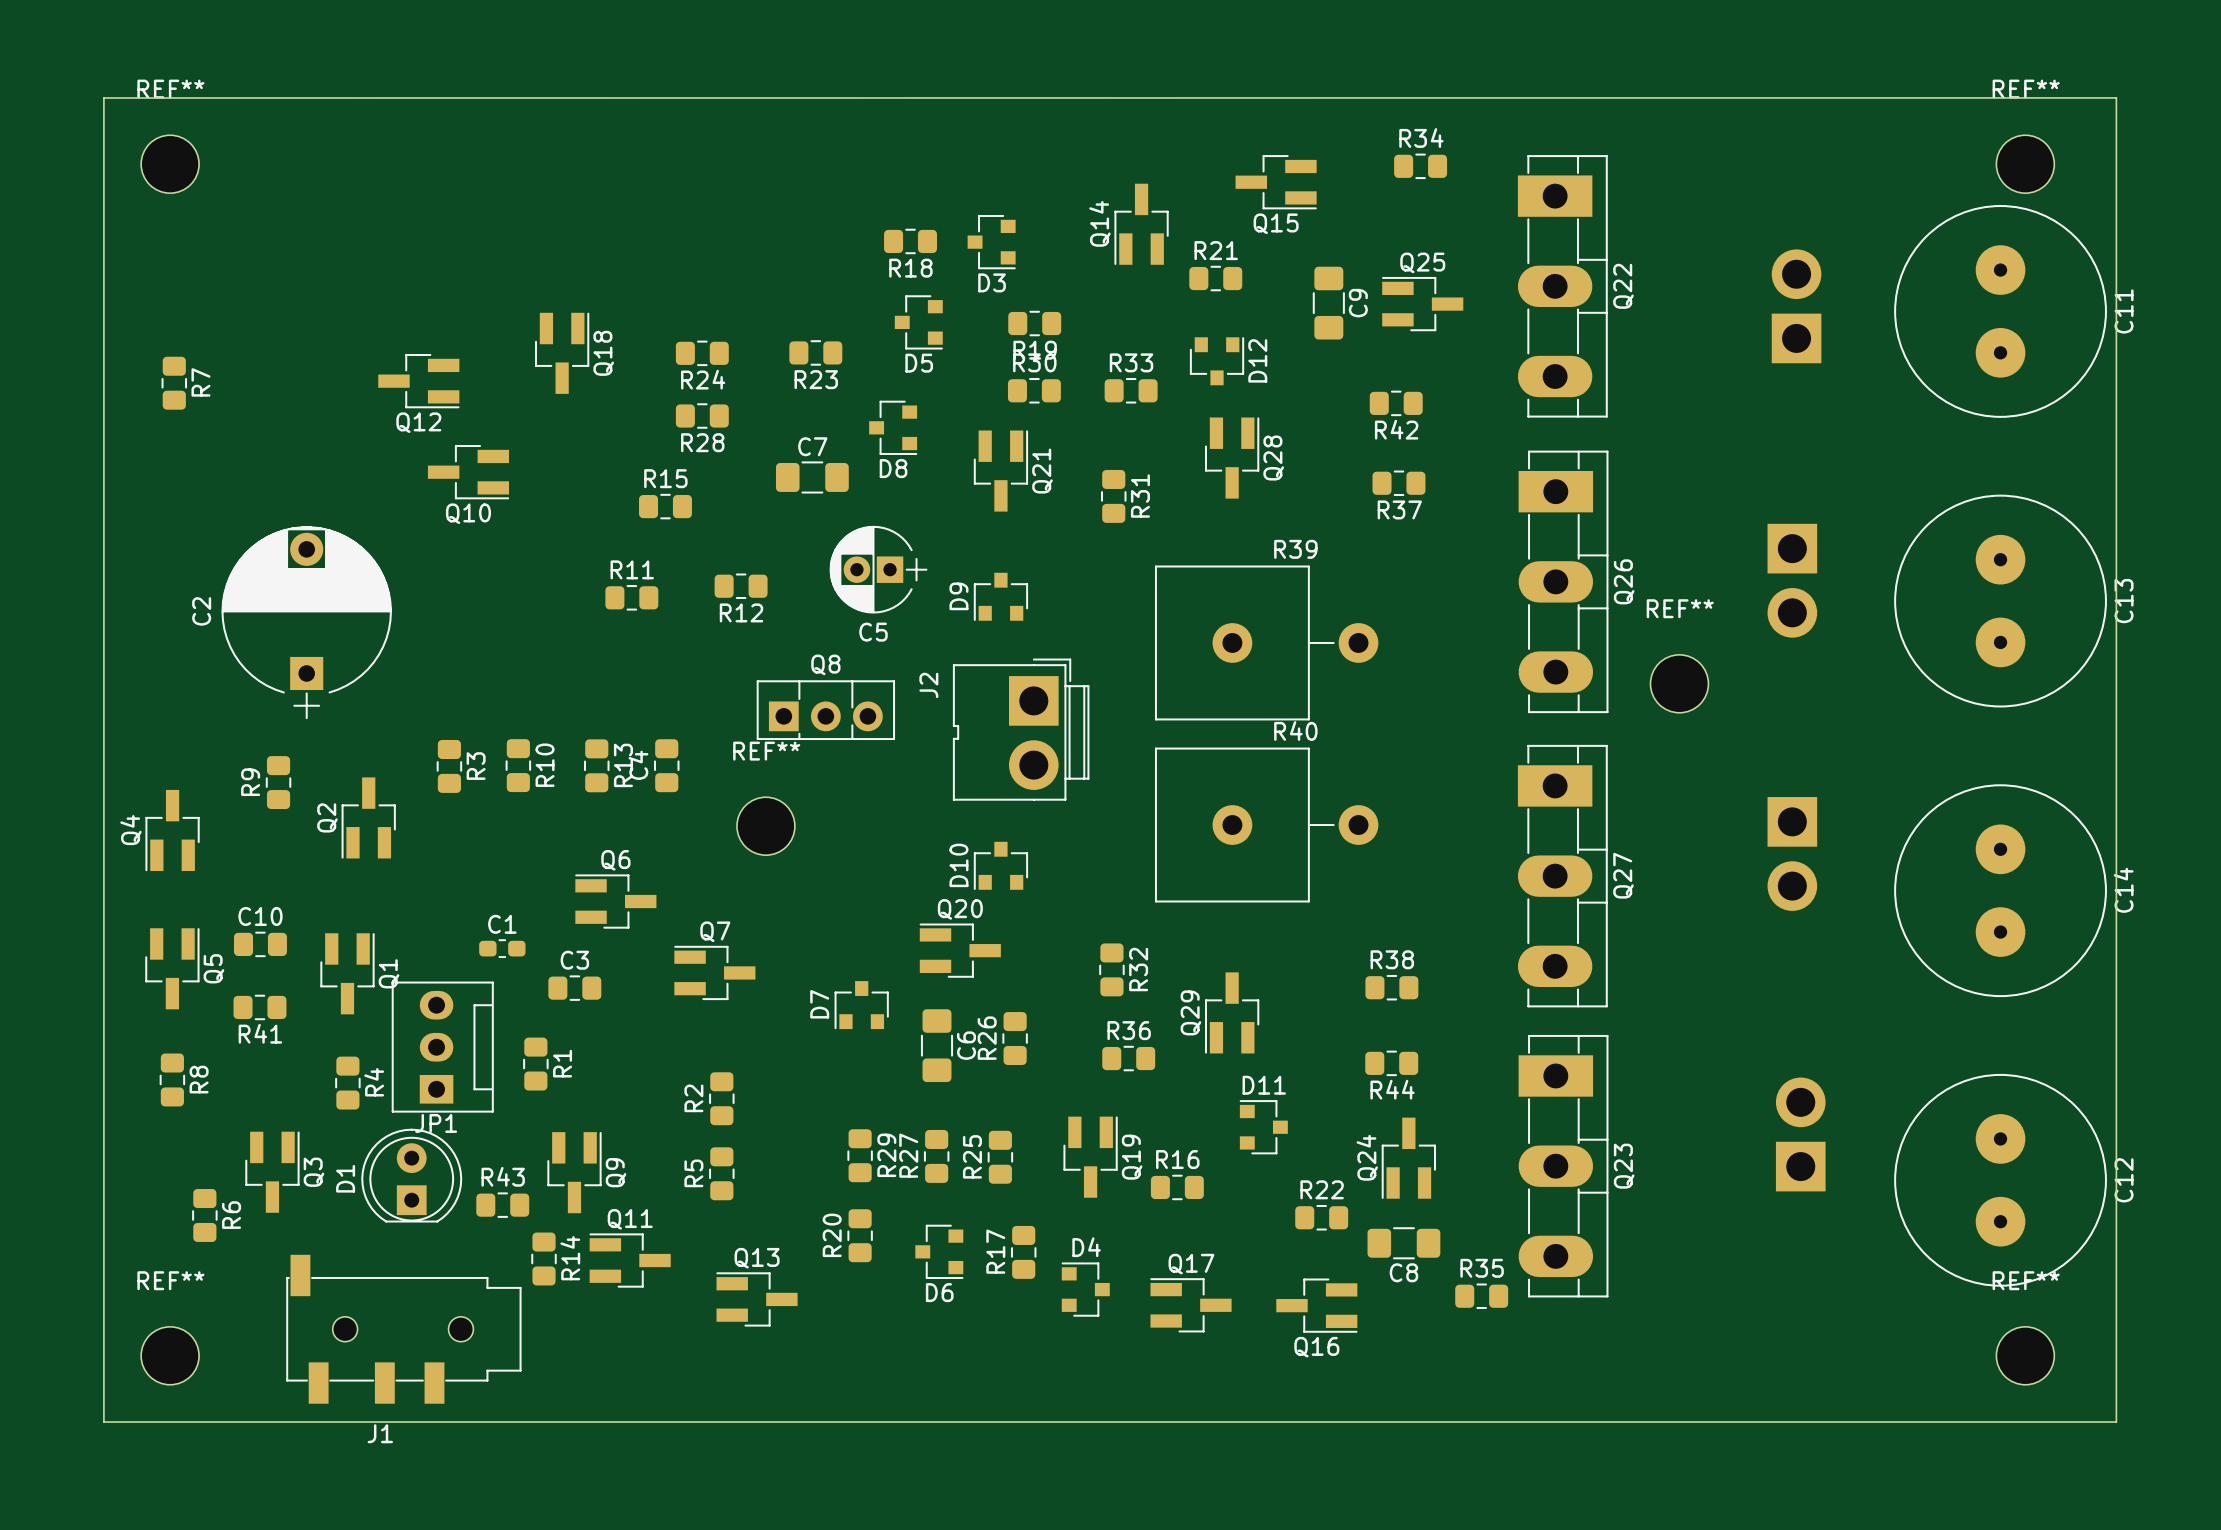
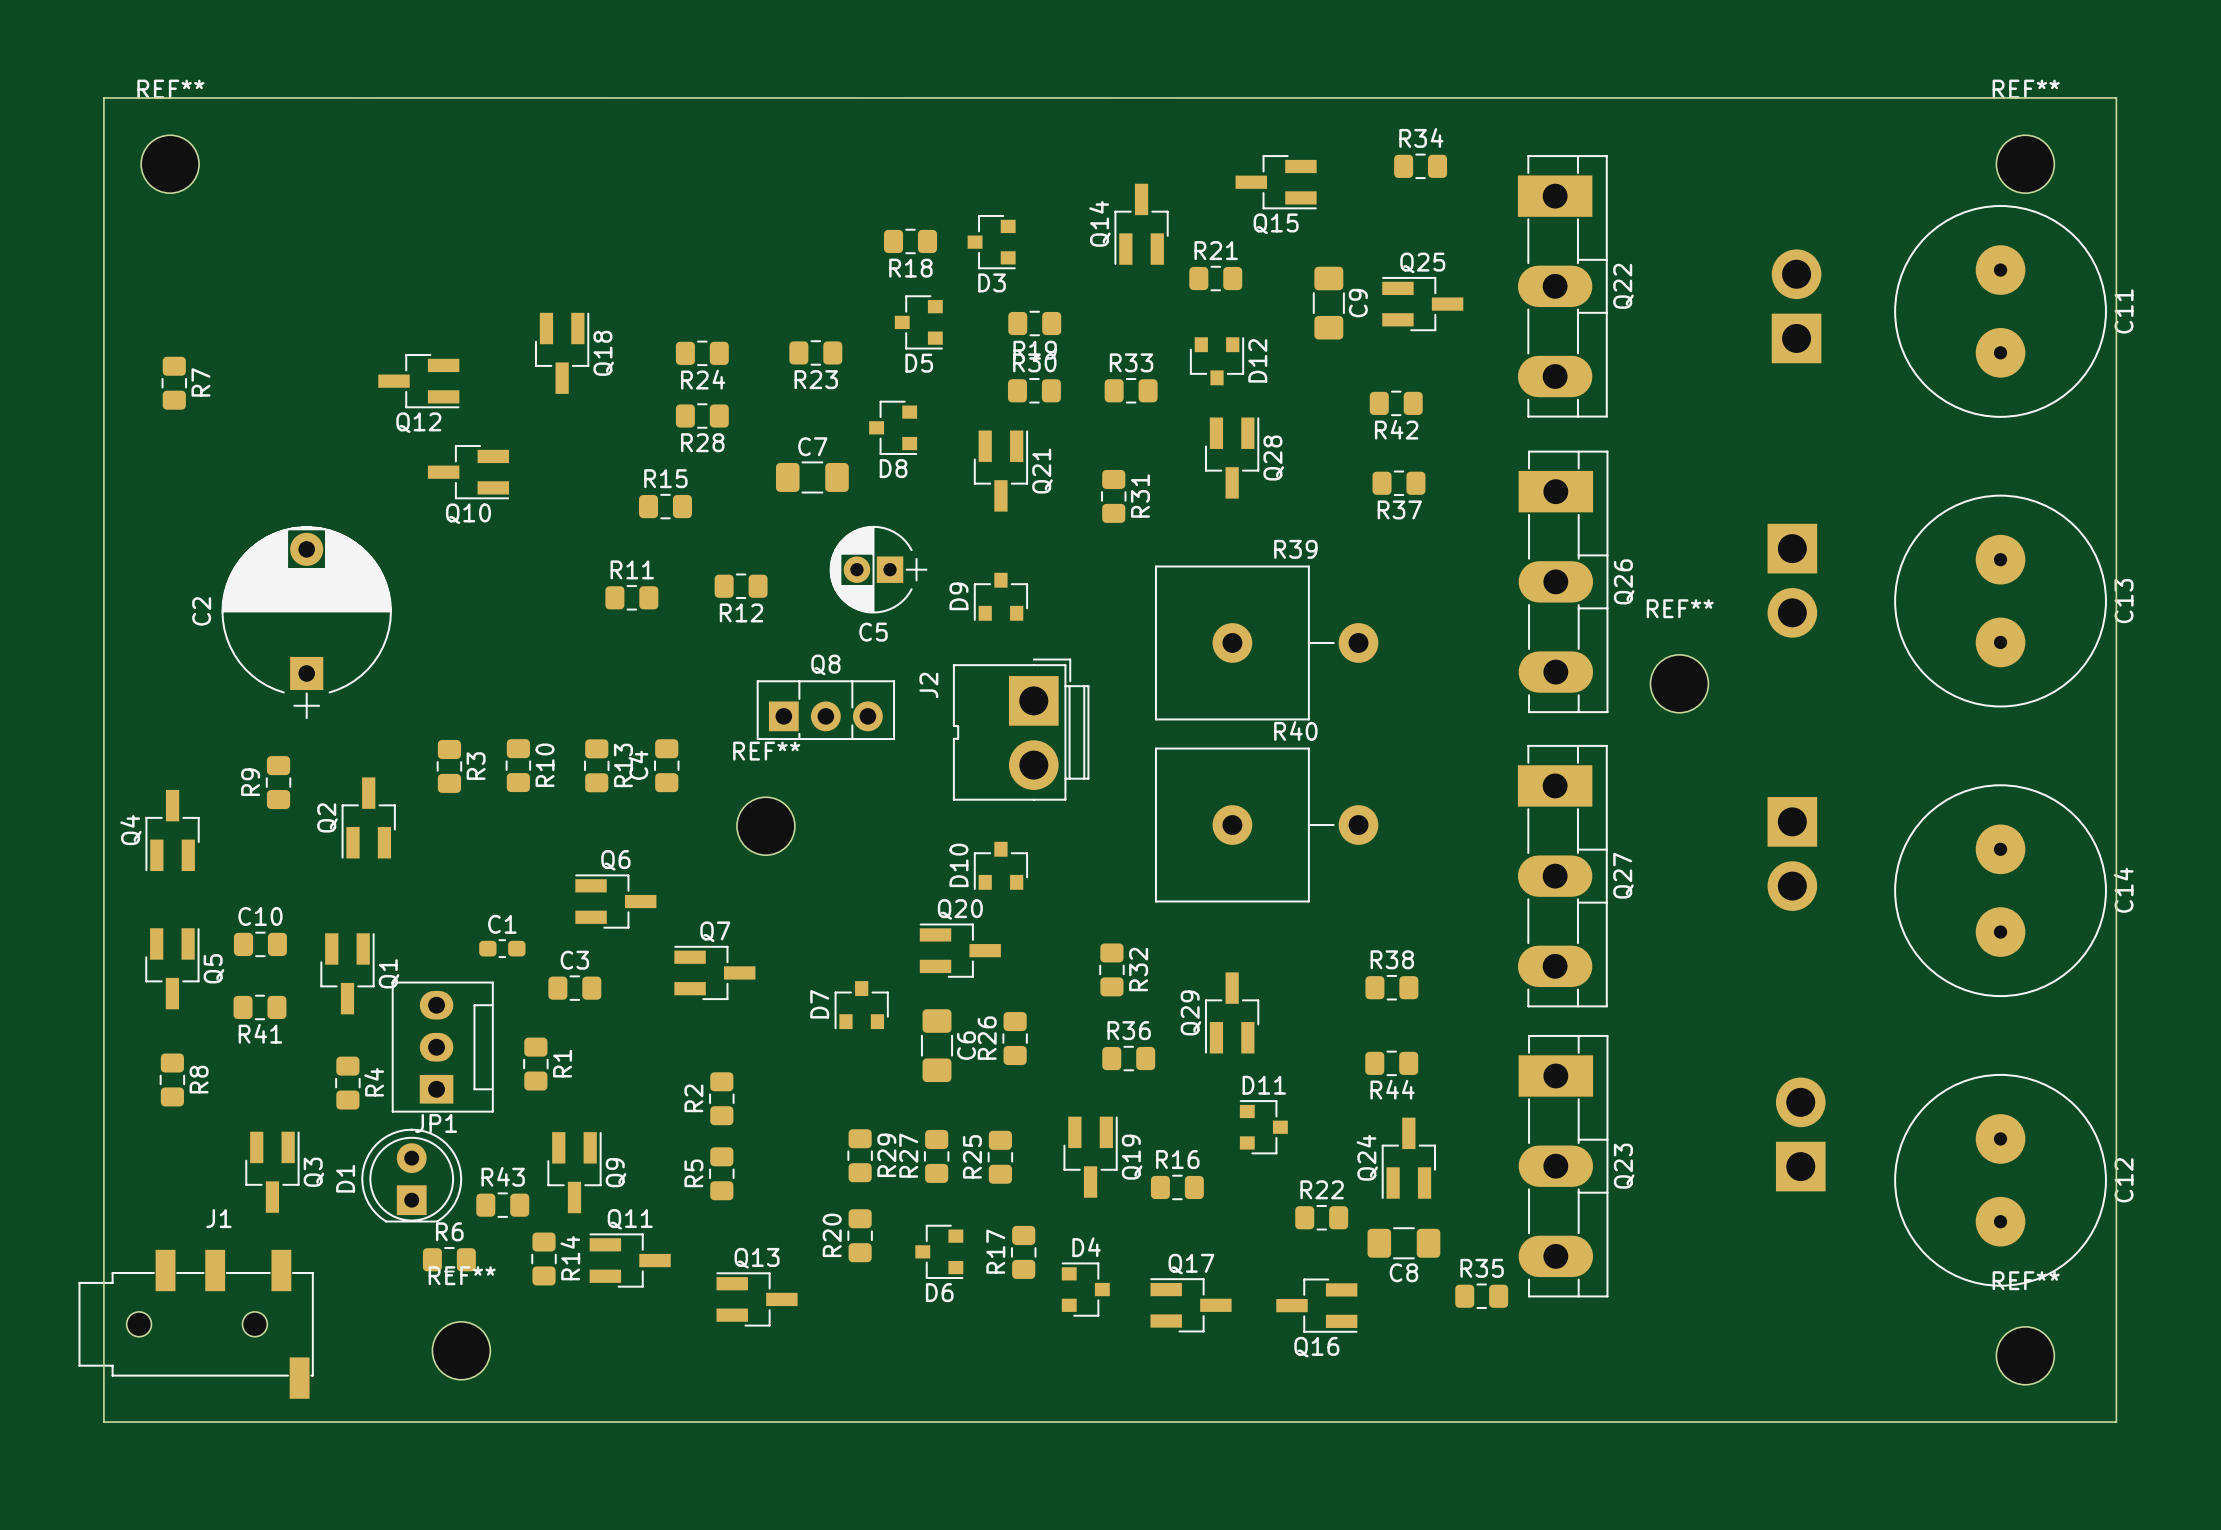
R6 rotation: 0° (204, 1215) -> 90° clockwise (449, 1259)
R6 position: (204, 1215) -> (449, 1259)
R6 name position: R6 (231, 1215) -> R6 (449, 1231)
J1 rotation: 0° (403, 1329) -> 180° (196, 1324)
J1 position: (403, 1329) -> (196, 1324)
REF** position: (170, 1355) -> (461, 1350)

